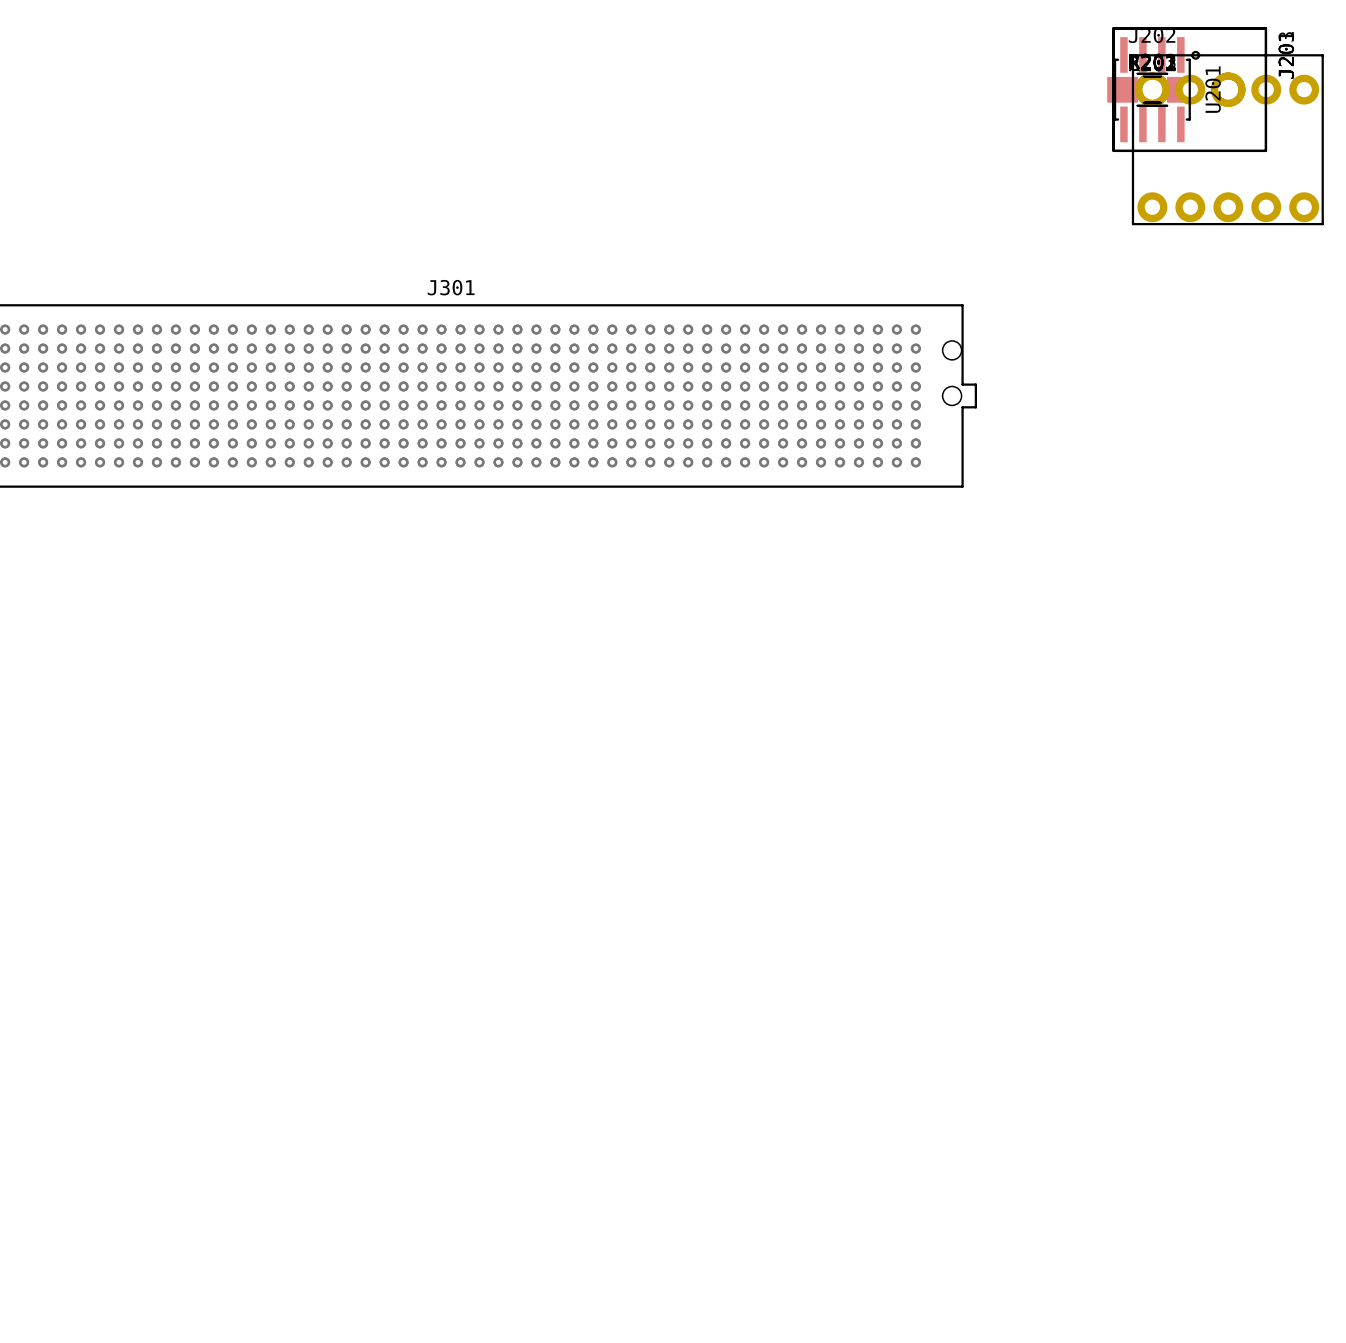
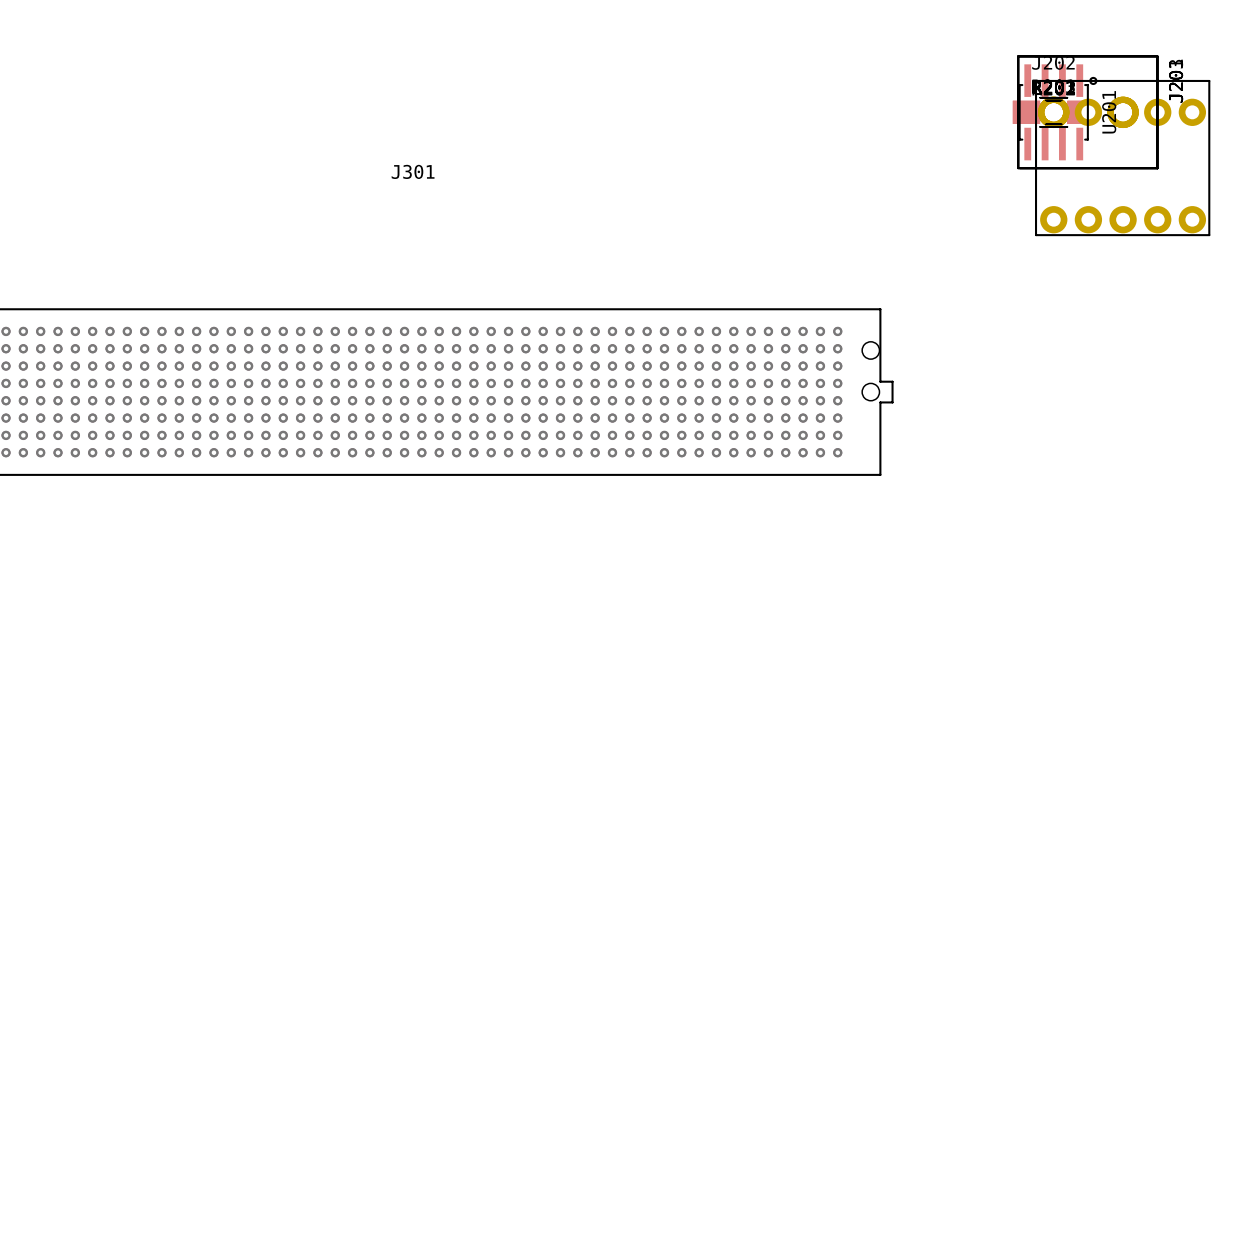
J301 name position: J301 (451, 287) -> J301 (413, 171)

